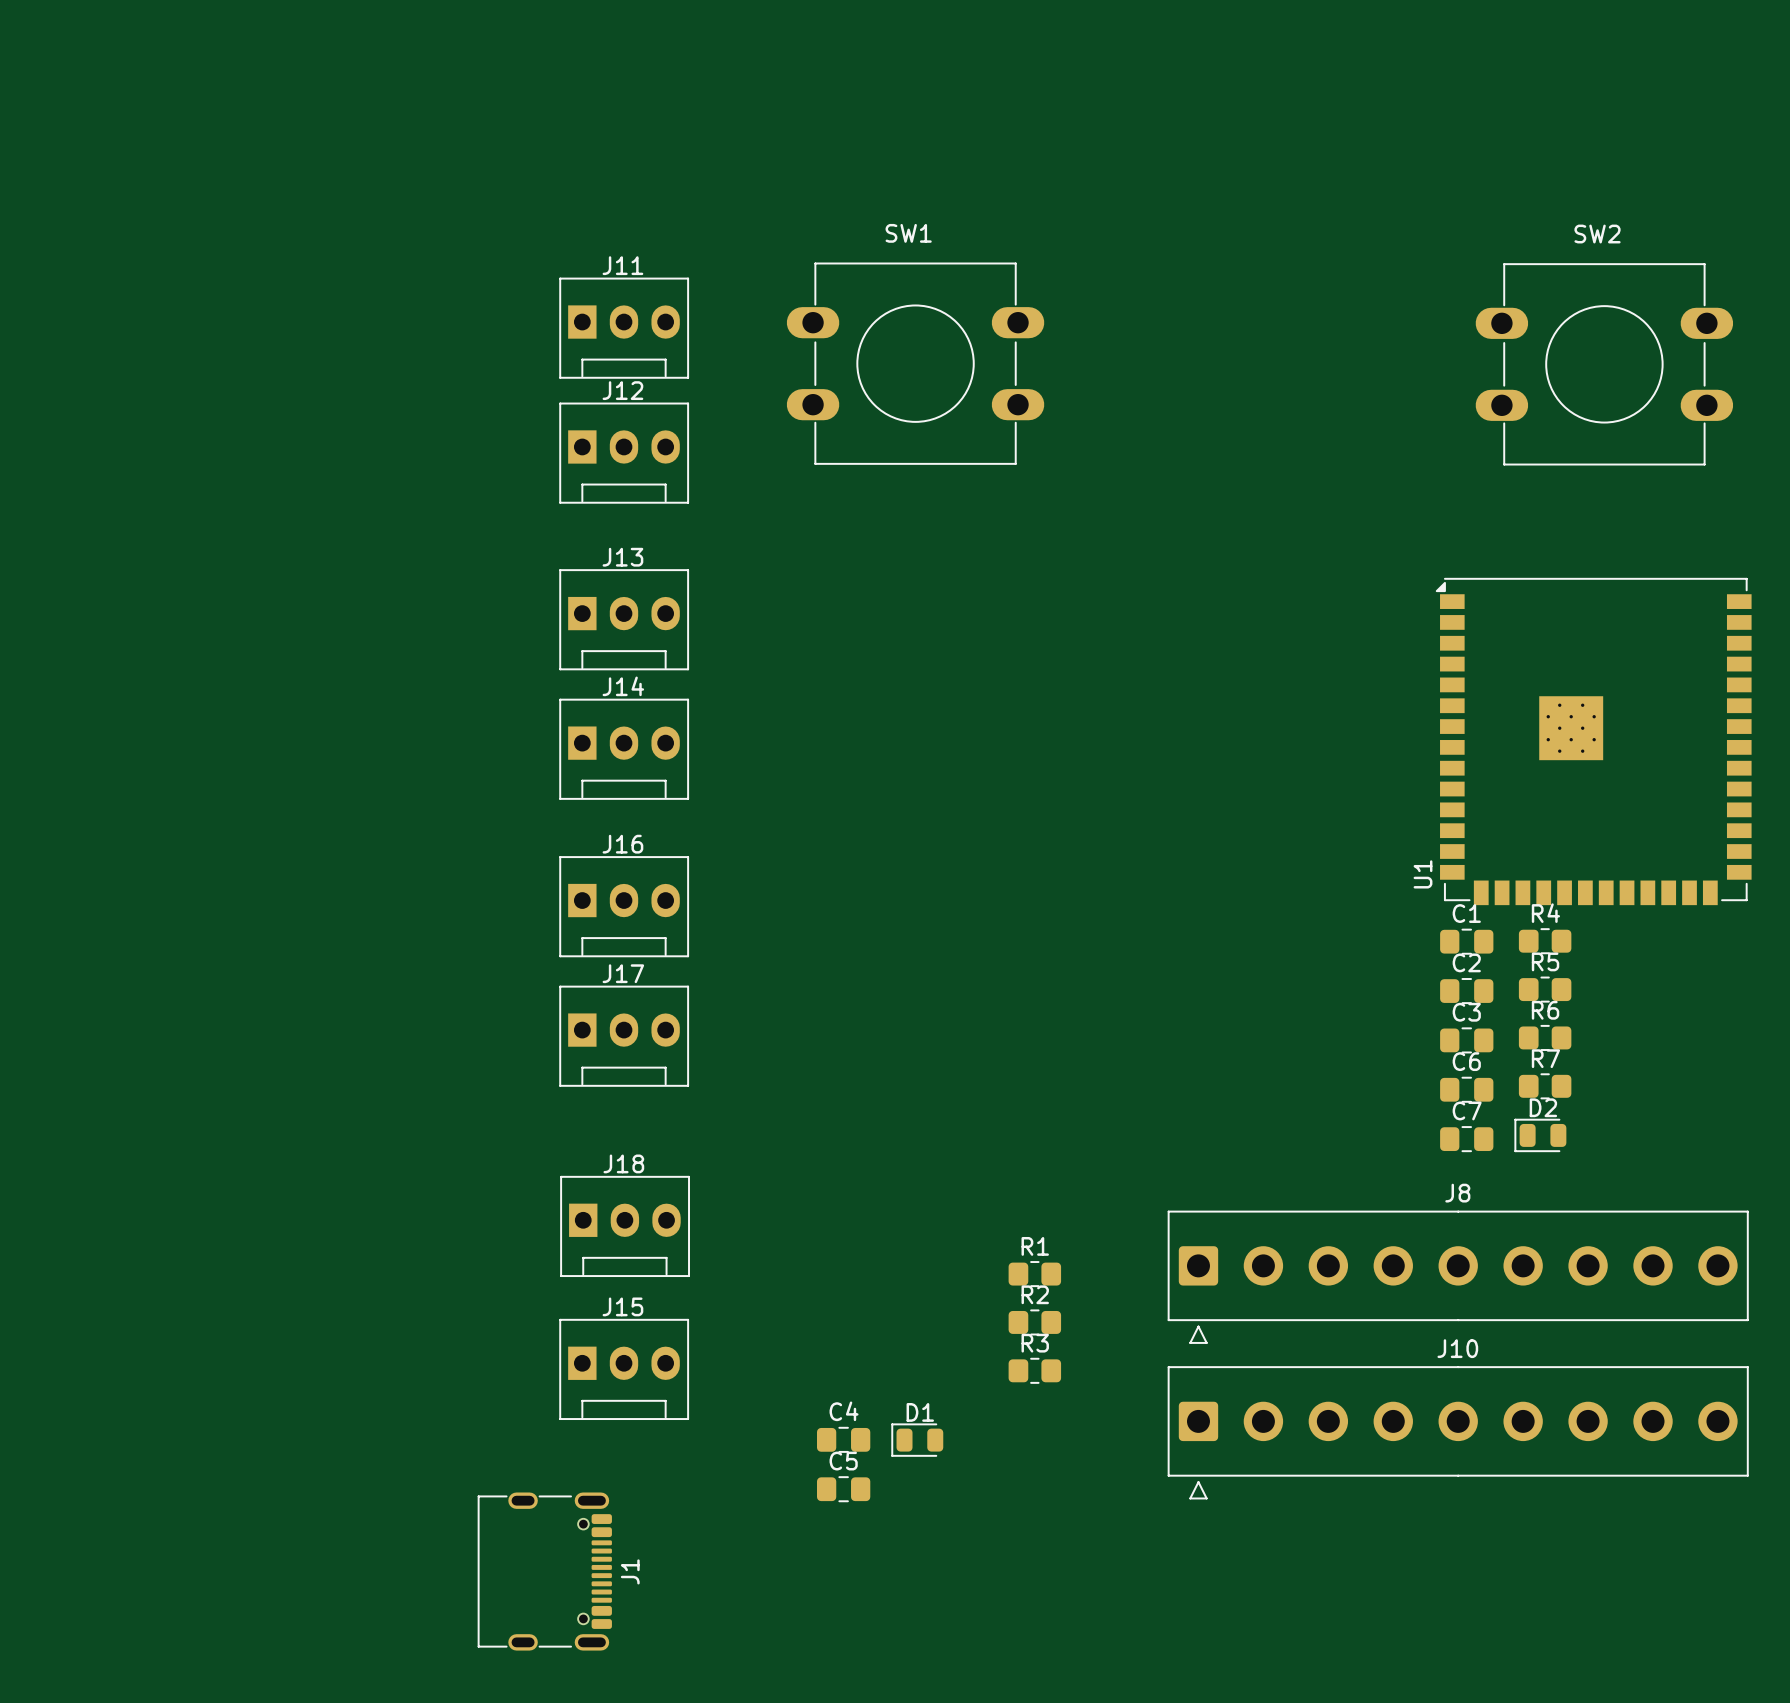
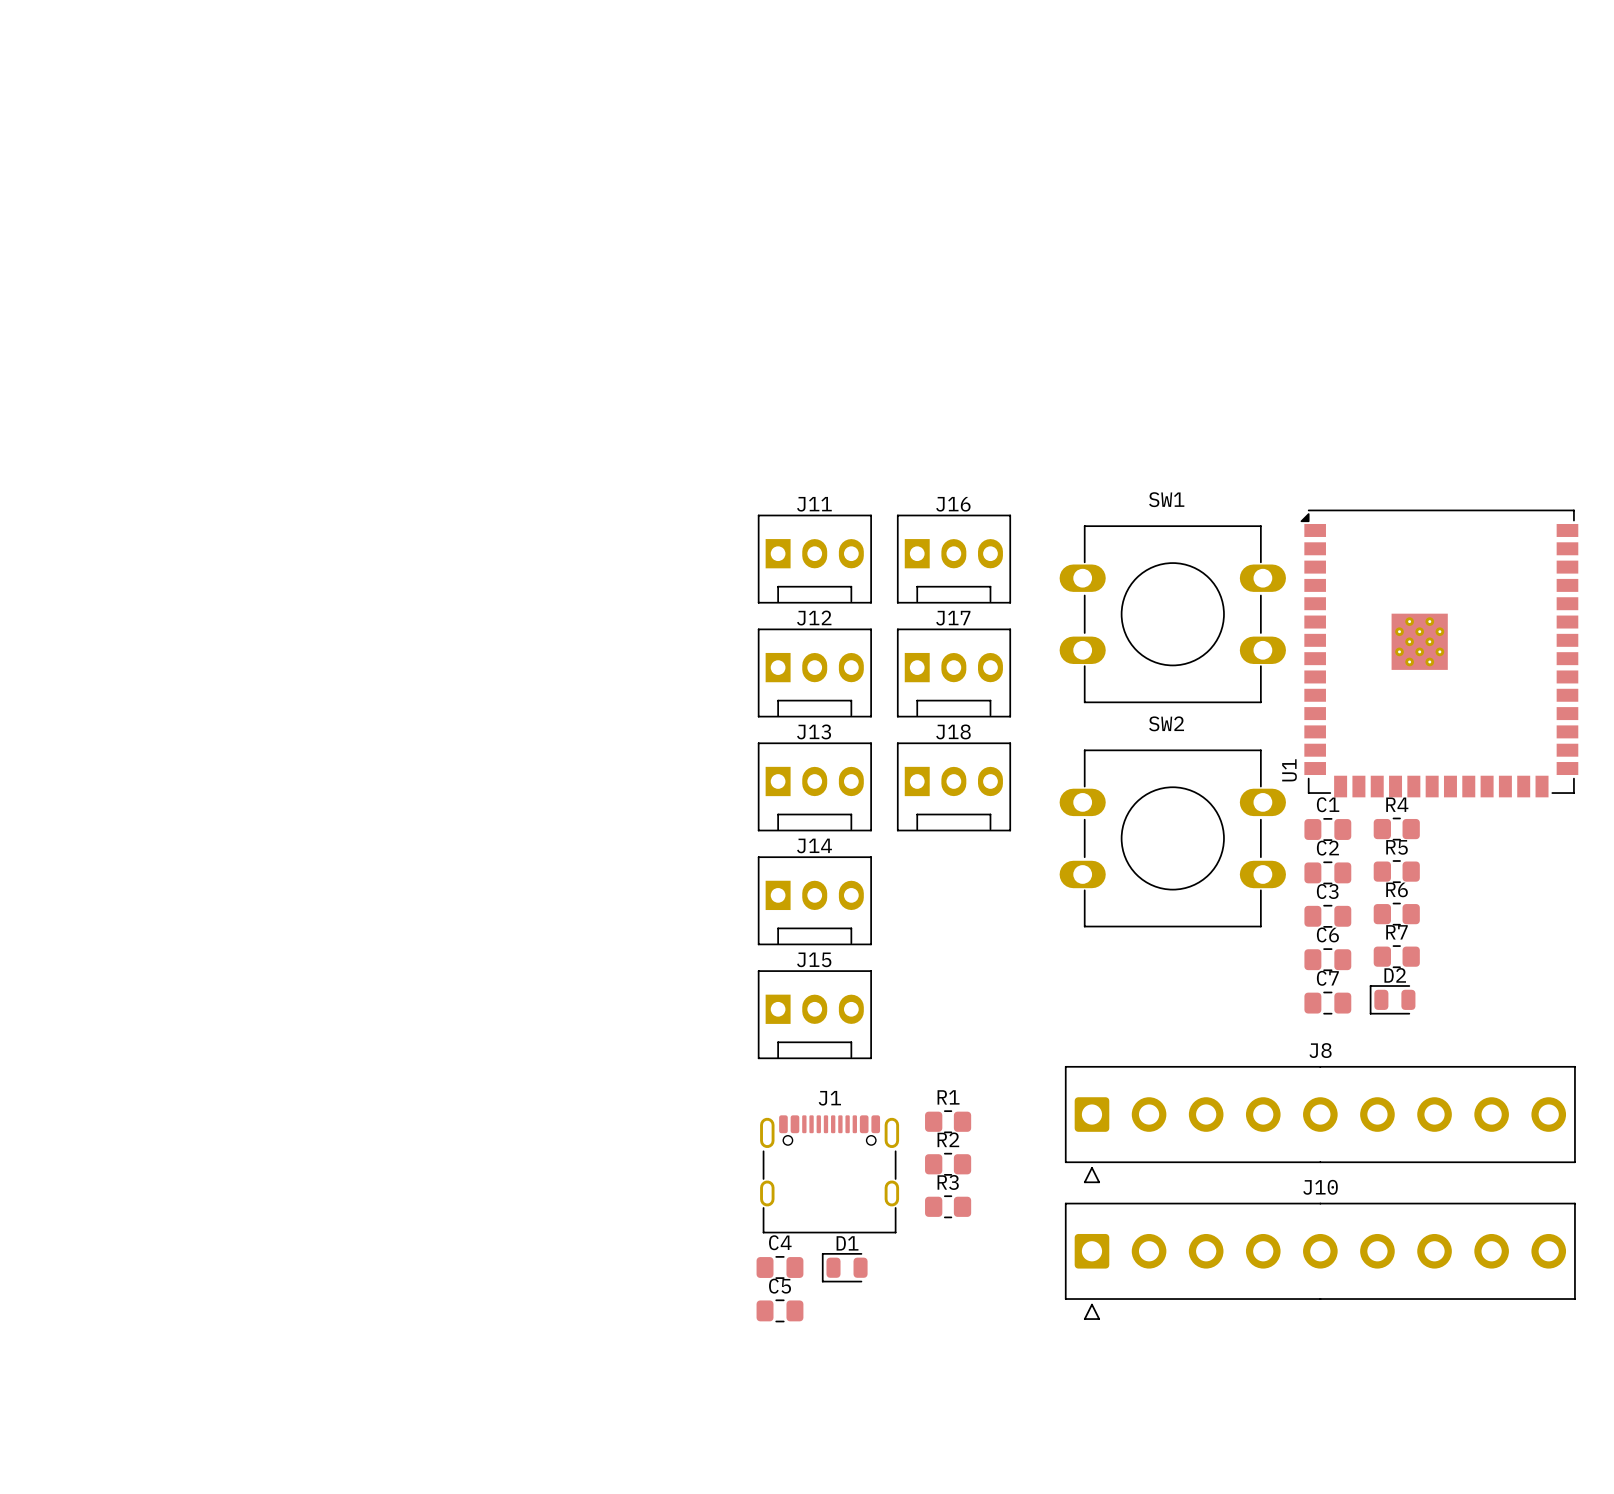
J11 position: (624, 328) -> (814, 559)
SW1 position: (915, 363) -> (1172, 614)
SW2 position: (1604, 364) -> (1172, 838)
J12 position: (624, 453) -> (814, 673)
J13 position: (624, 619) -> (814, 786)
J14 position: (624, 749) -> (814, 900)
J16 position: (624, 906) -> (954, 559)
J17 position: (624, 1036) -> (954, 673)
J18 position: (625, 1226) -> (954, 786)
J15 position: (624, 1369) -> (814, 1014)
J1 rotation: 0° (544, 1571) -> 90° counterclockwise (829, 1174)
J1 position: (544, 1571) -> (829, 1174)

